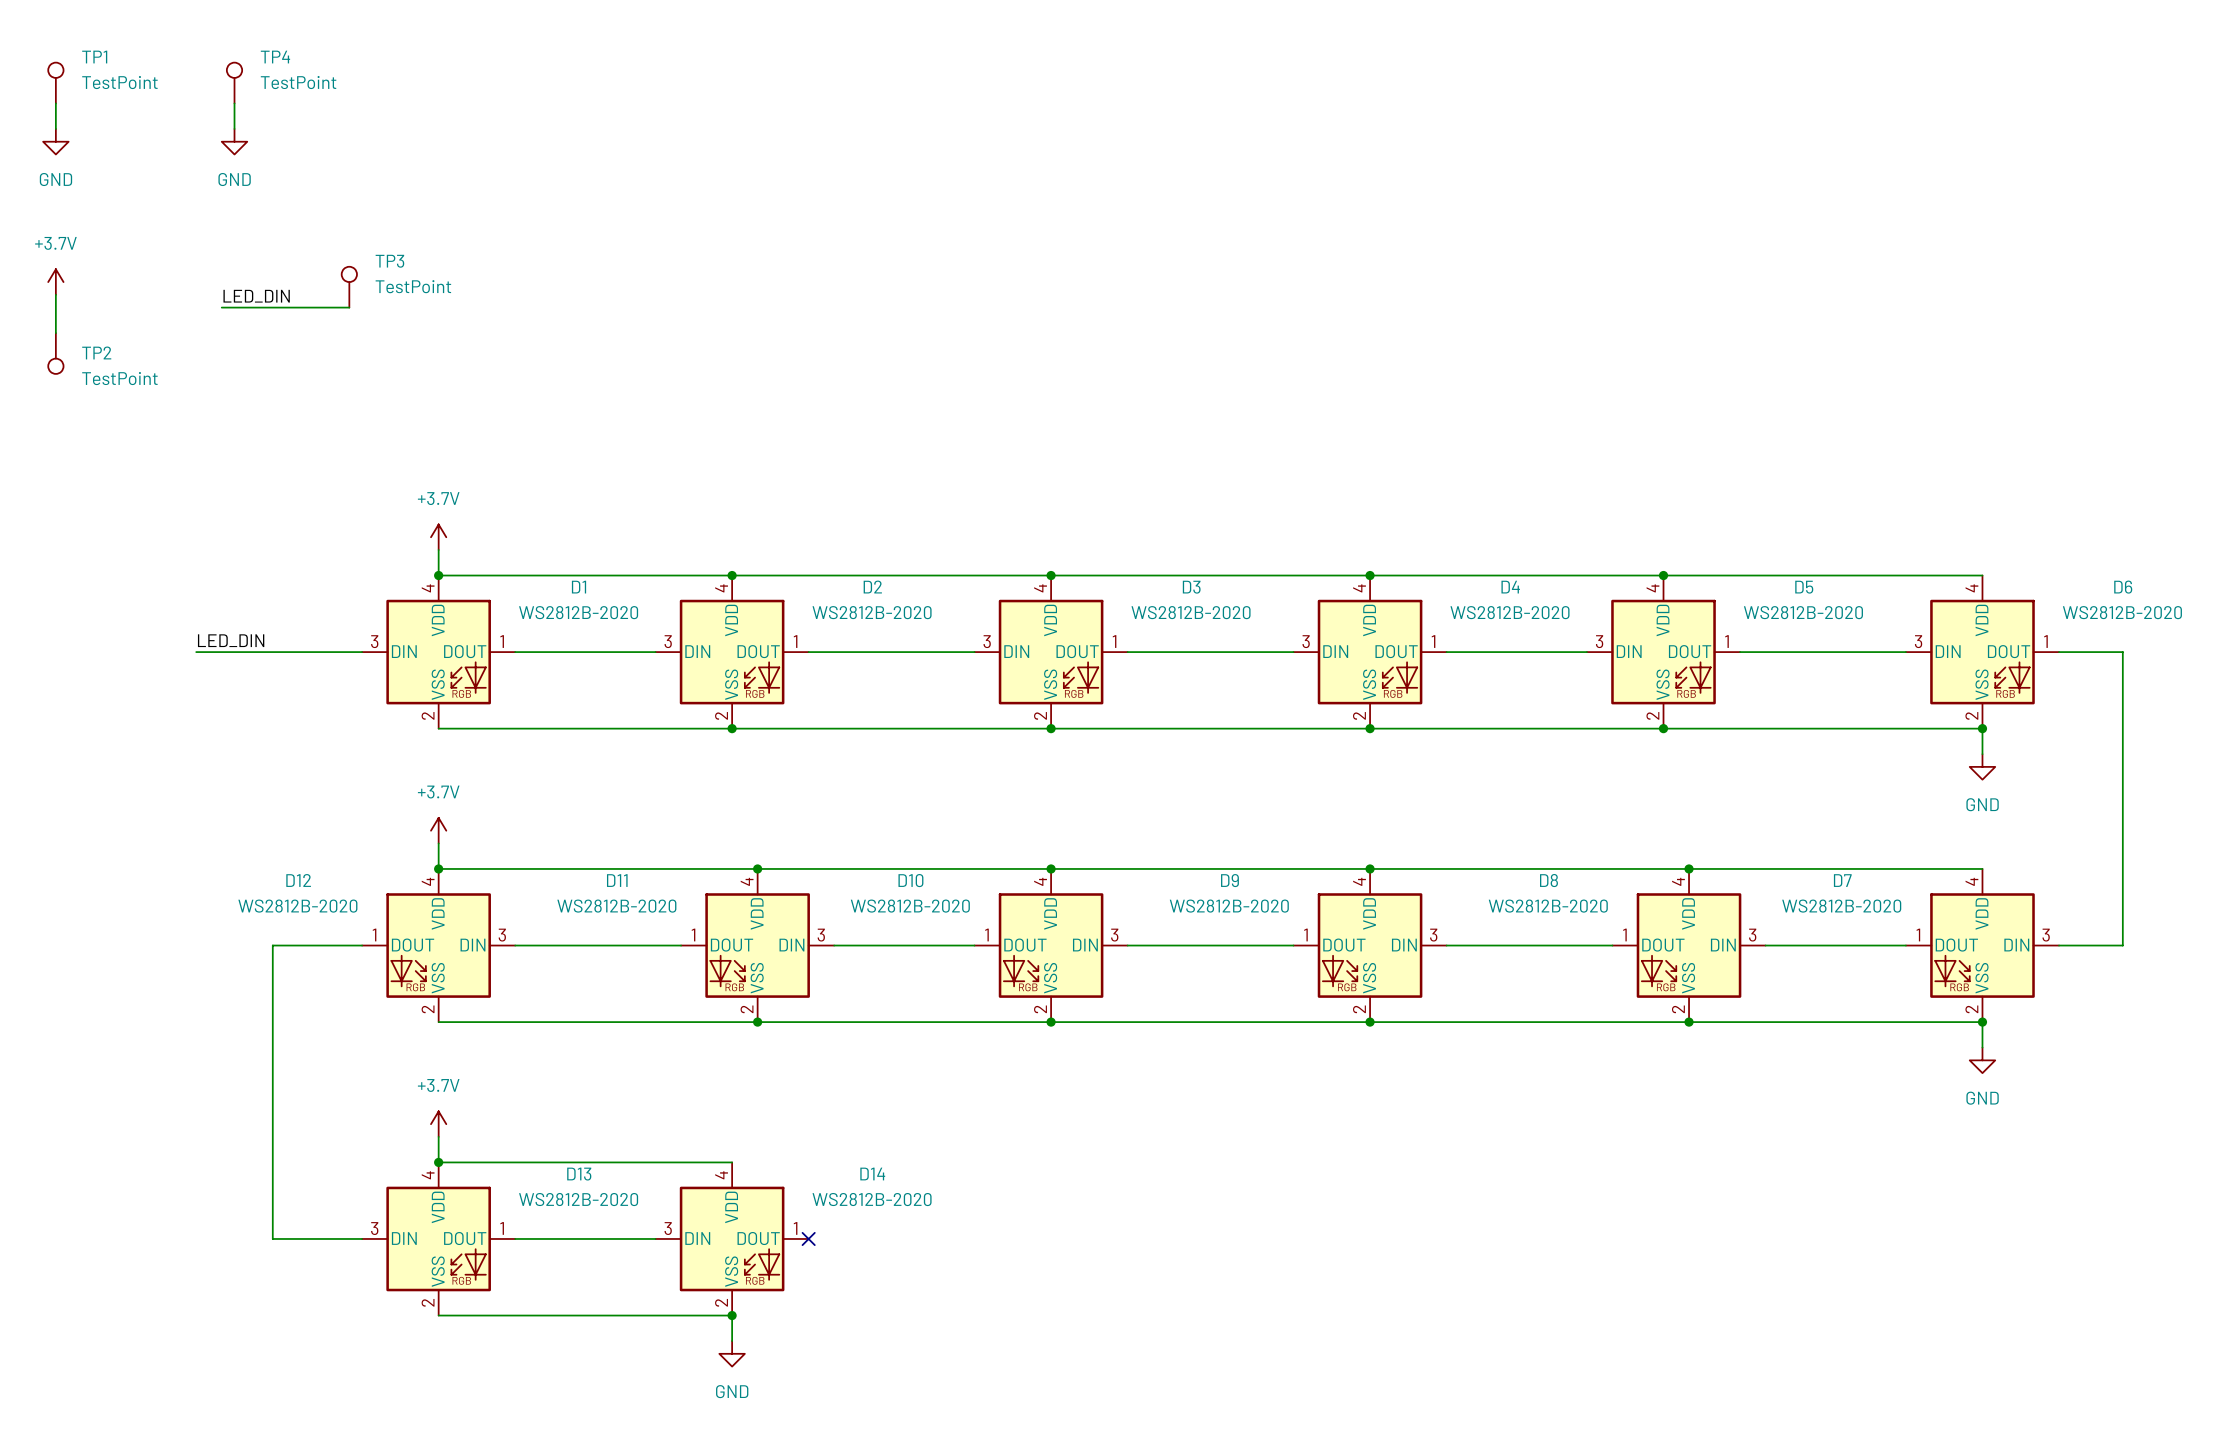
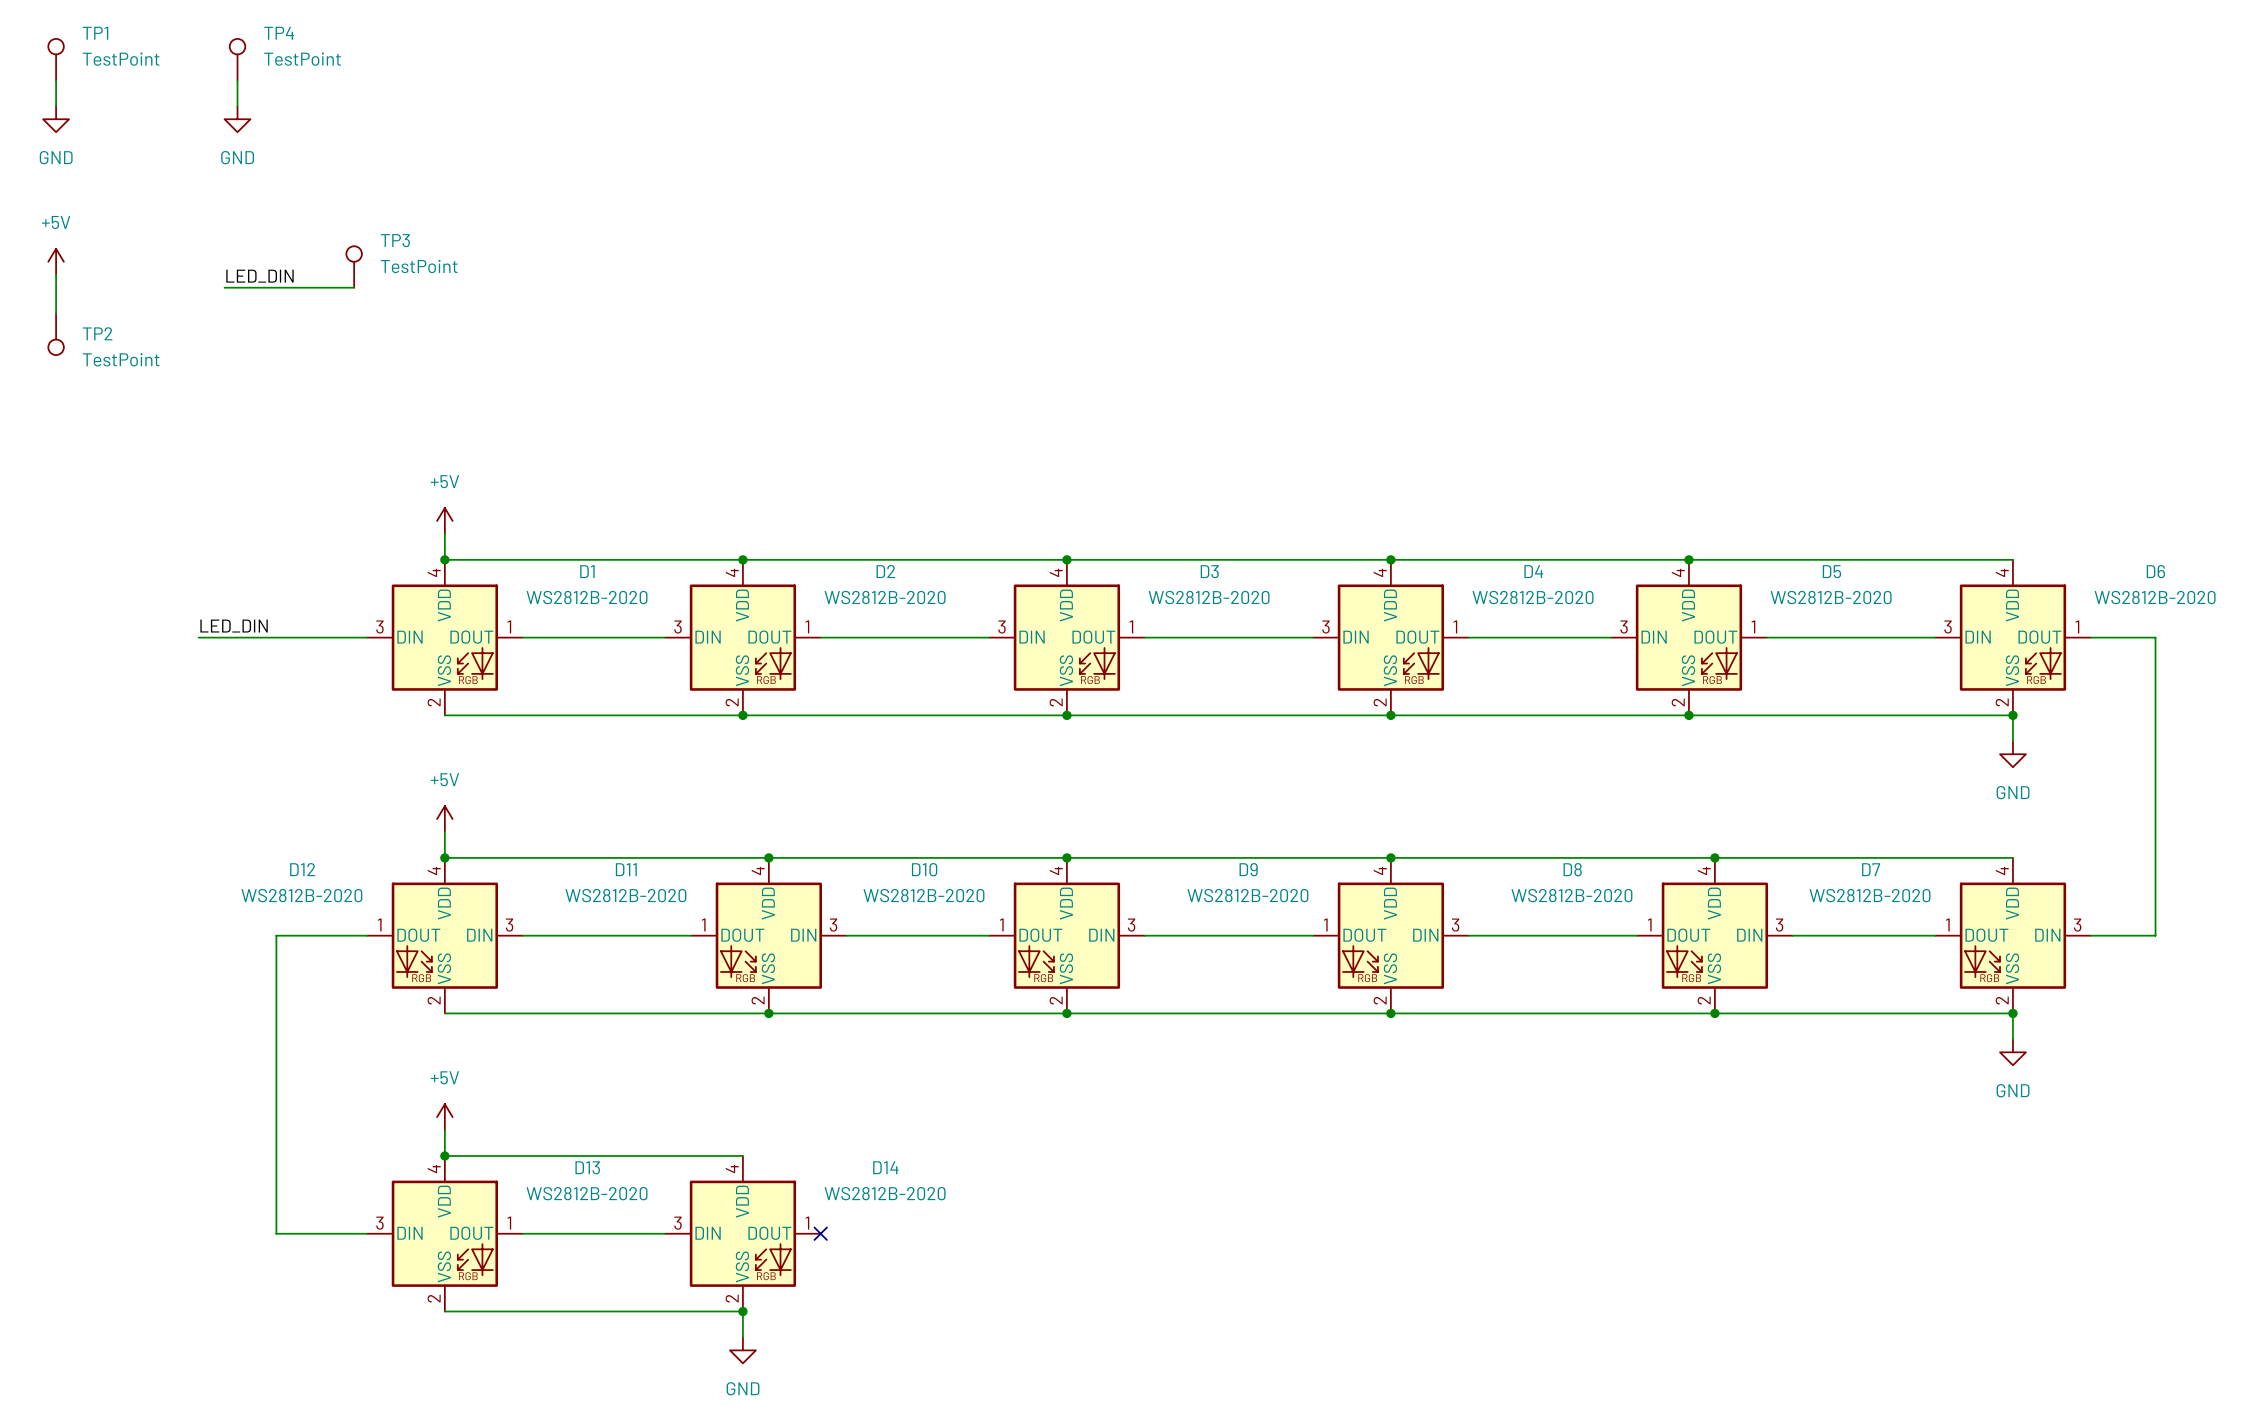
power symbol: +3.7V (55, 282) -> +5V (56, 261)
power symbol: +3.7V (438, 537) -> +5V (444, 520)
power symbol: +3.7V (438, 830) -> +5V (444, 819)
power symbol: +3.7V (438, 1124) -> +5V (444, 1117)

